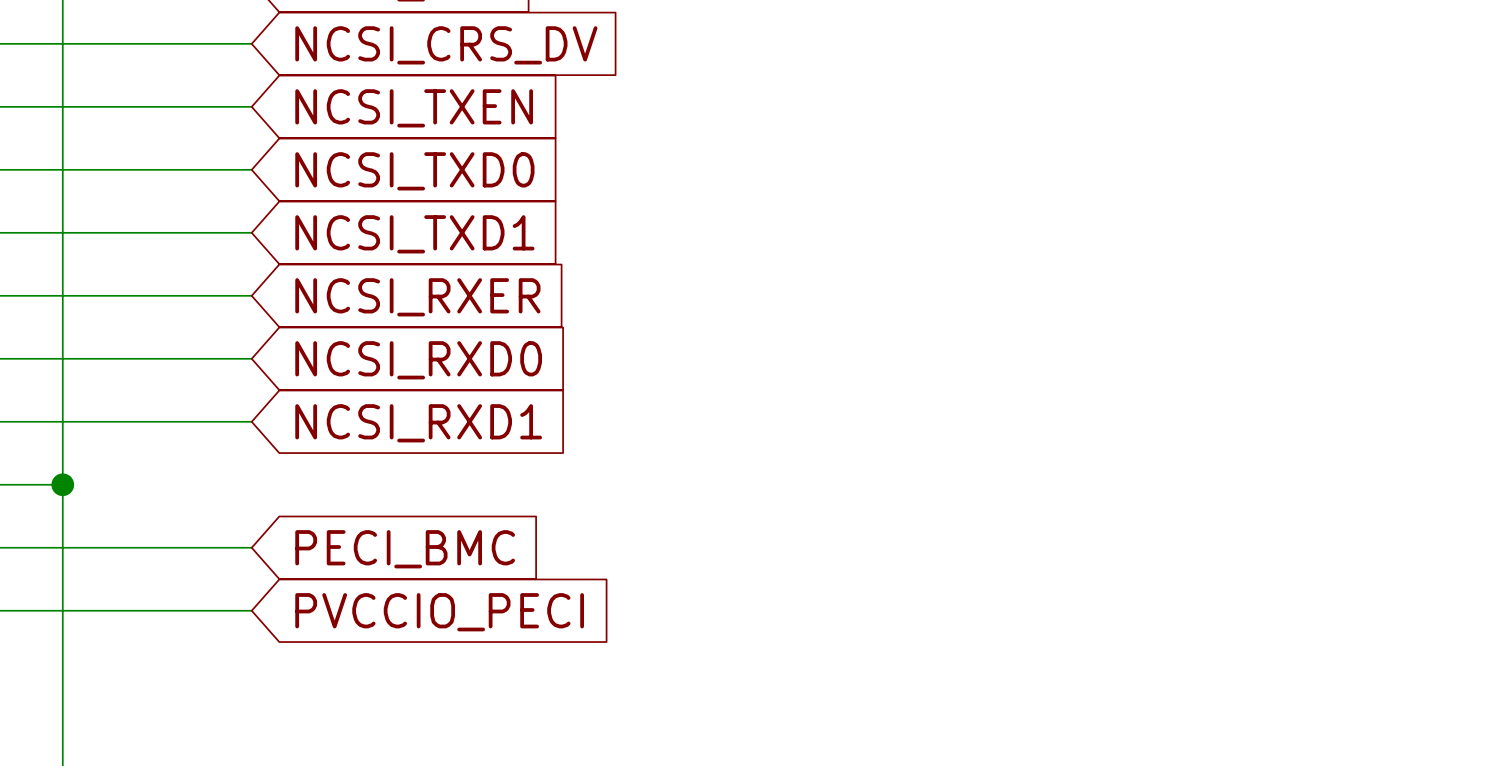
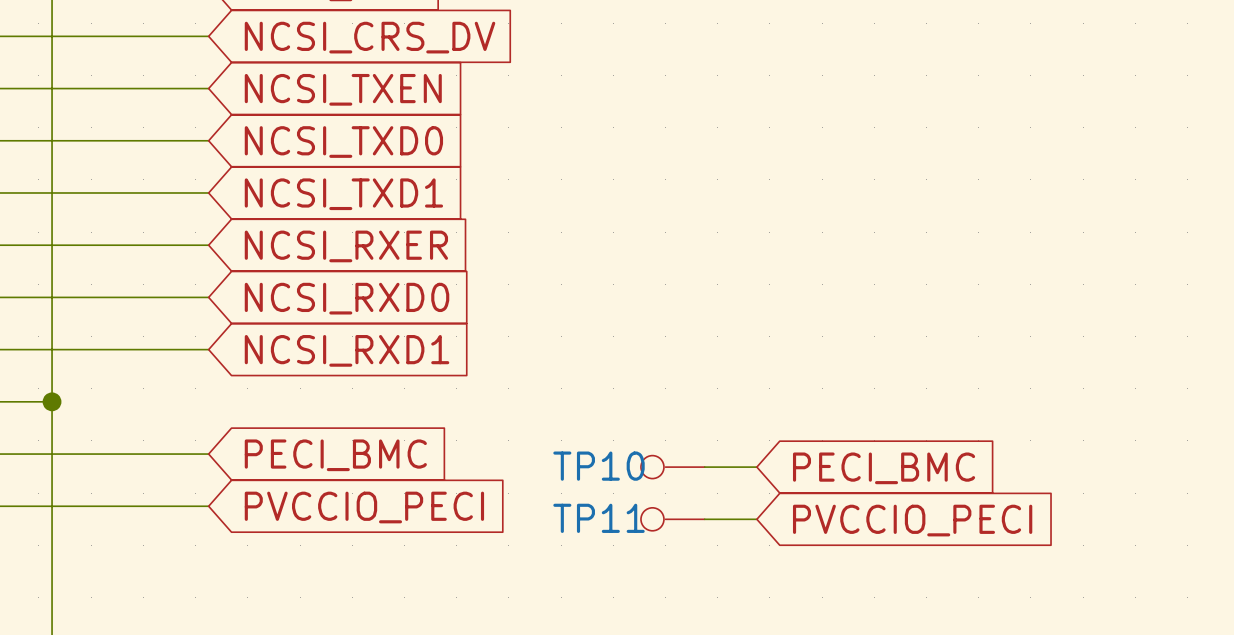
TP10: none -> (672, 467)
wire: none -> (704, 467) (756, 467)
global label: none -> PECI_BMC (884, 468)
TP11: none -> (672, 519)
wire: none -> (704, 519) (756, 519)
global label: none -> PVCCIO_PECI (912, 520)

